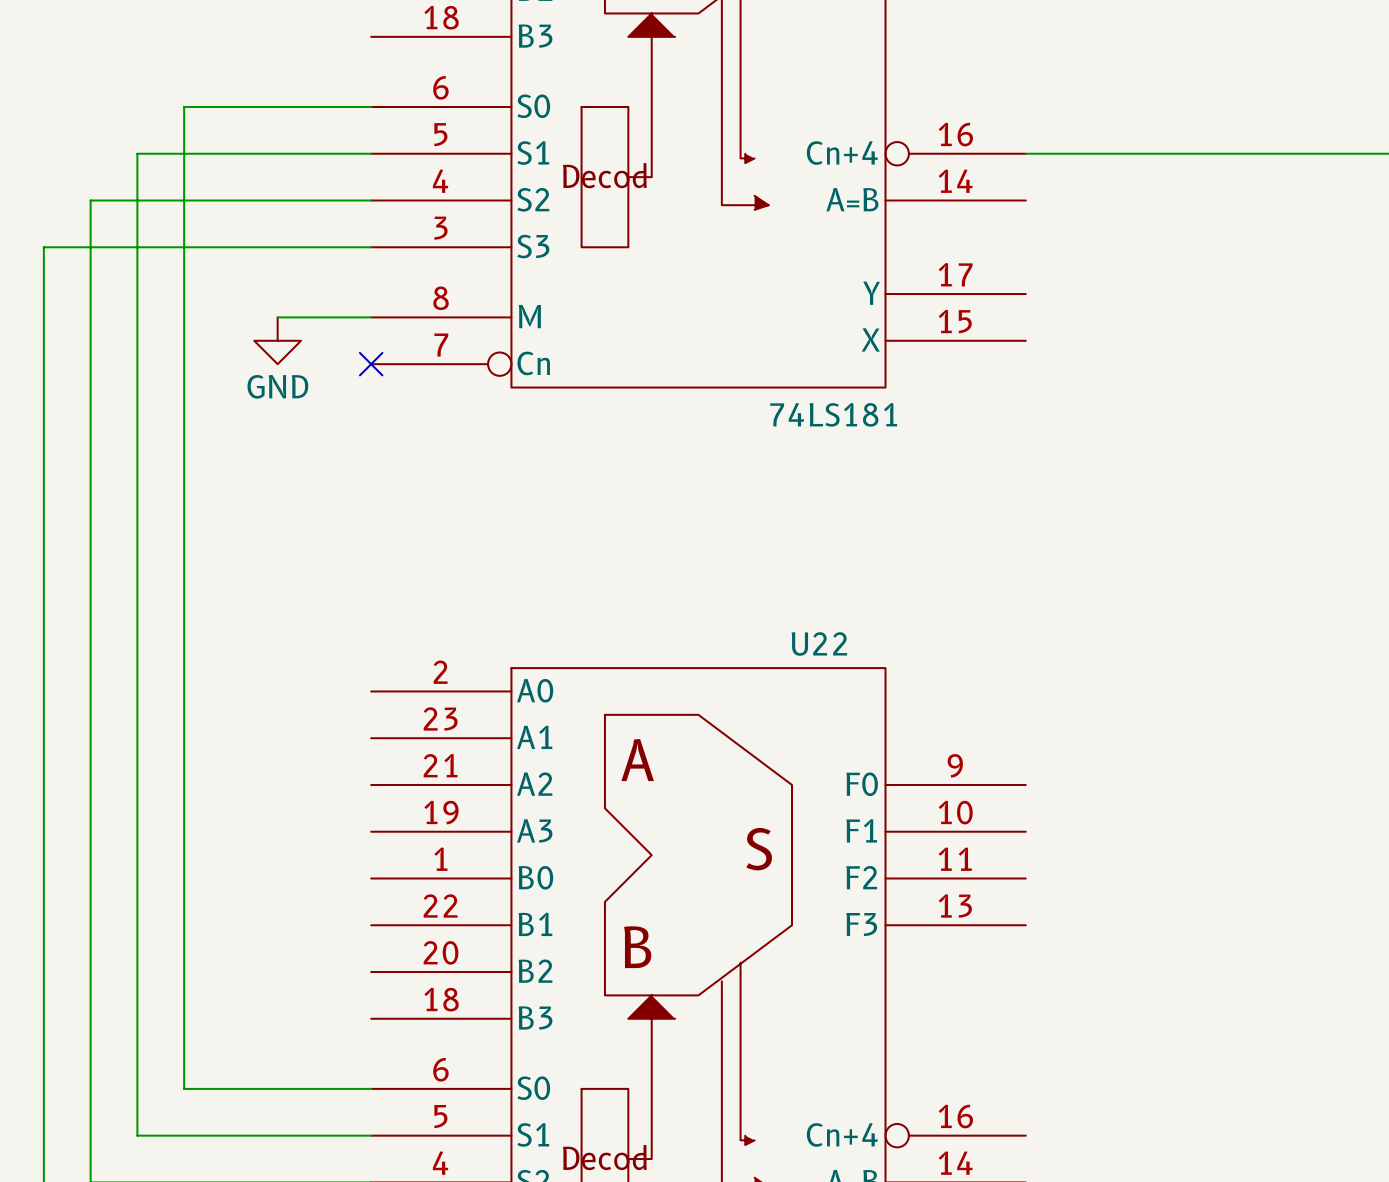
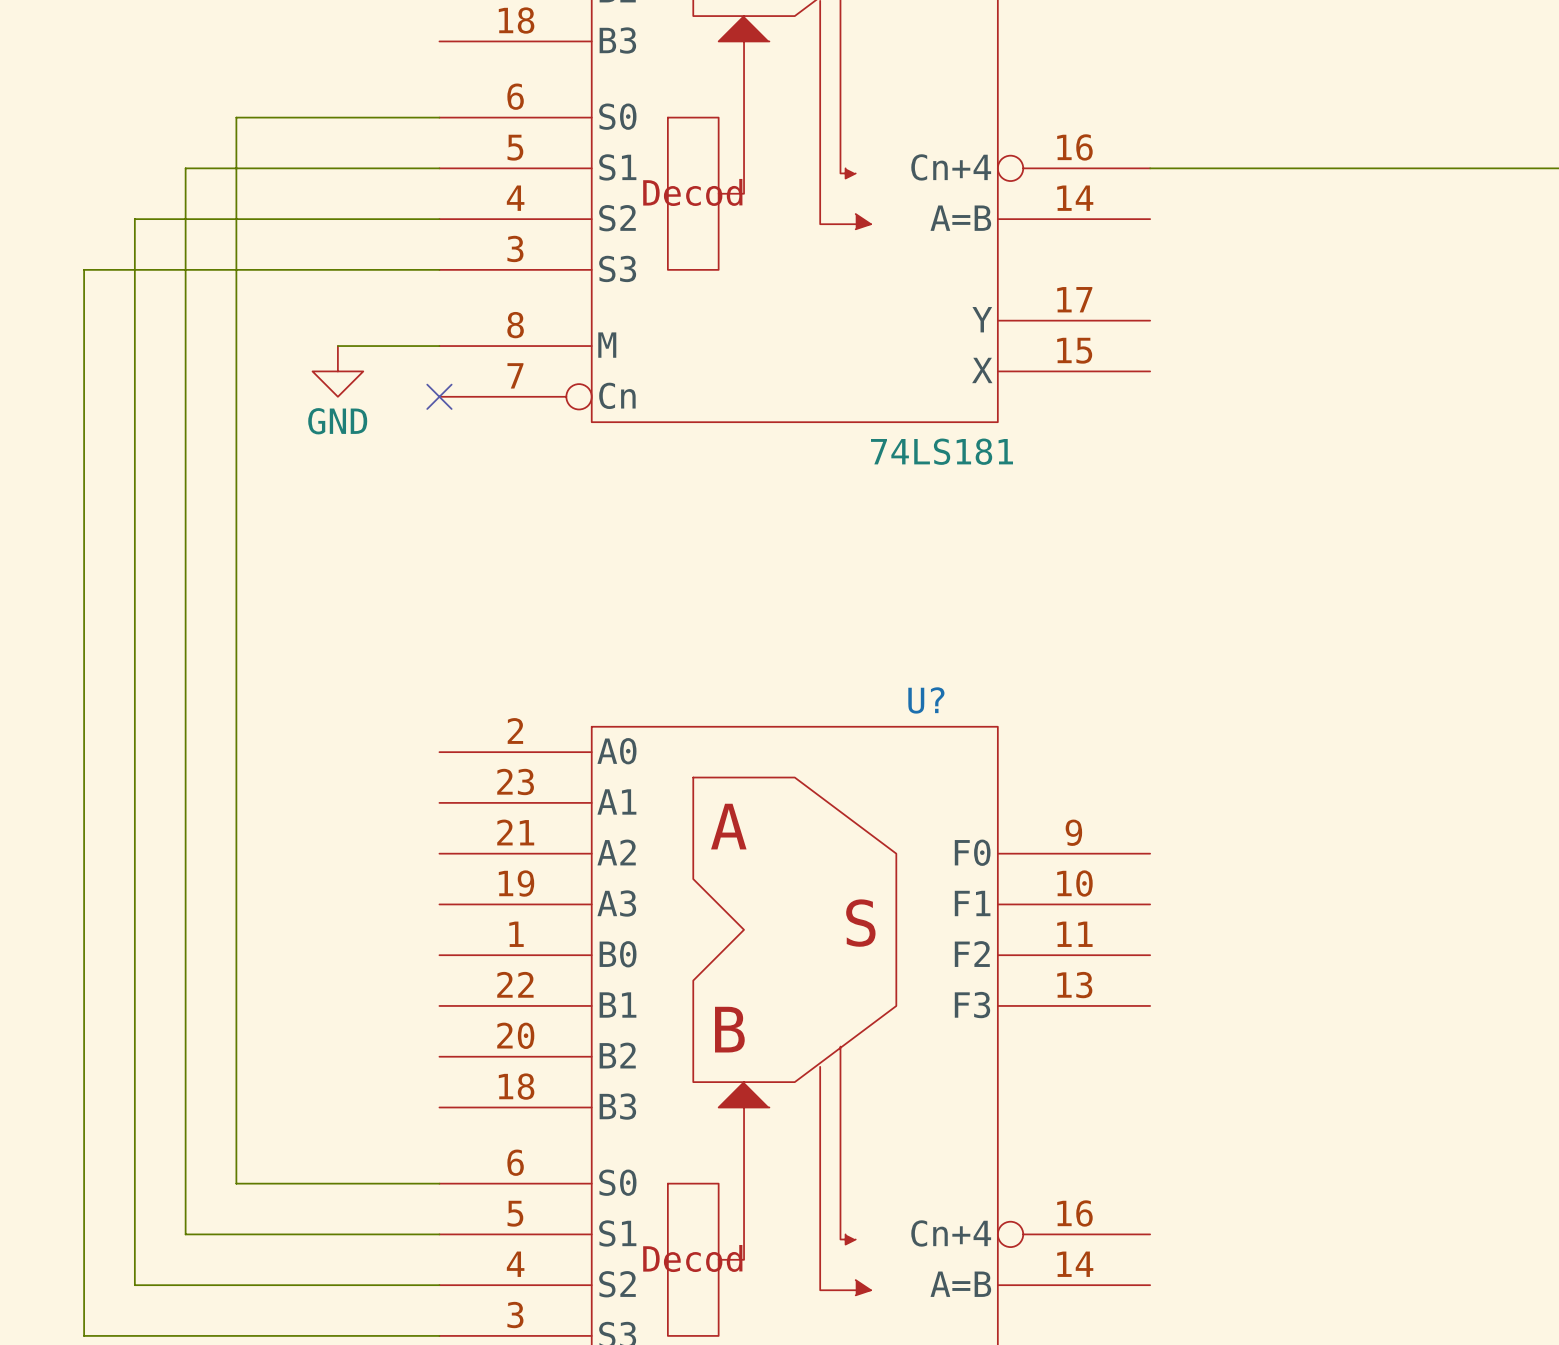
U22 name: U22 (819, 643) -> U? (926, 700)

